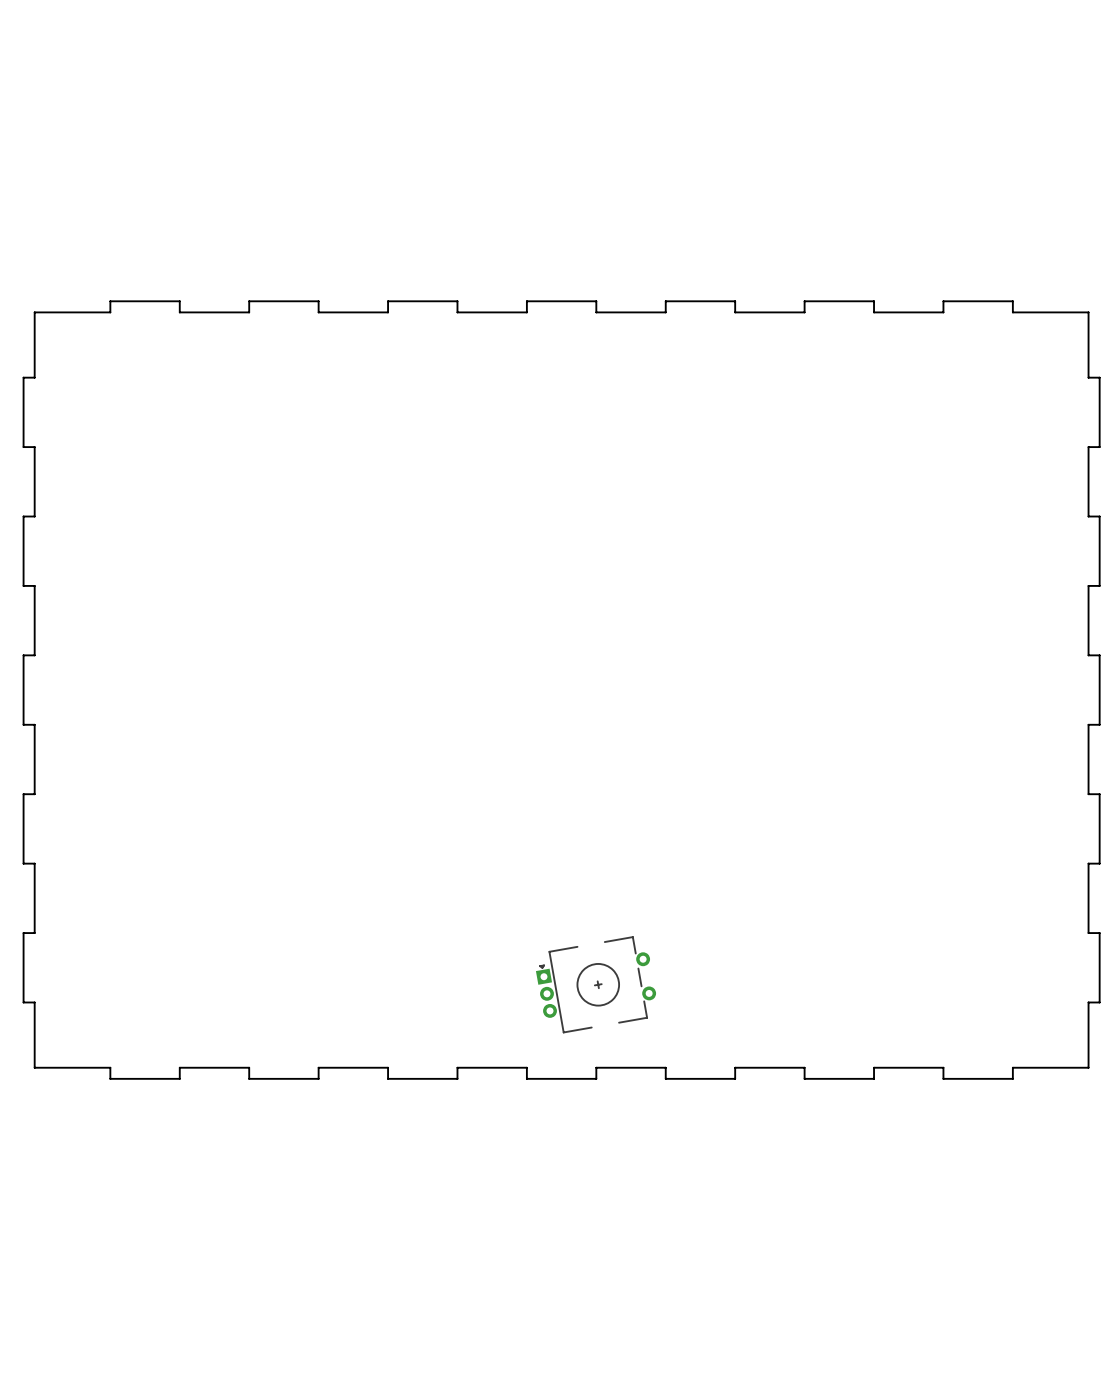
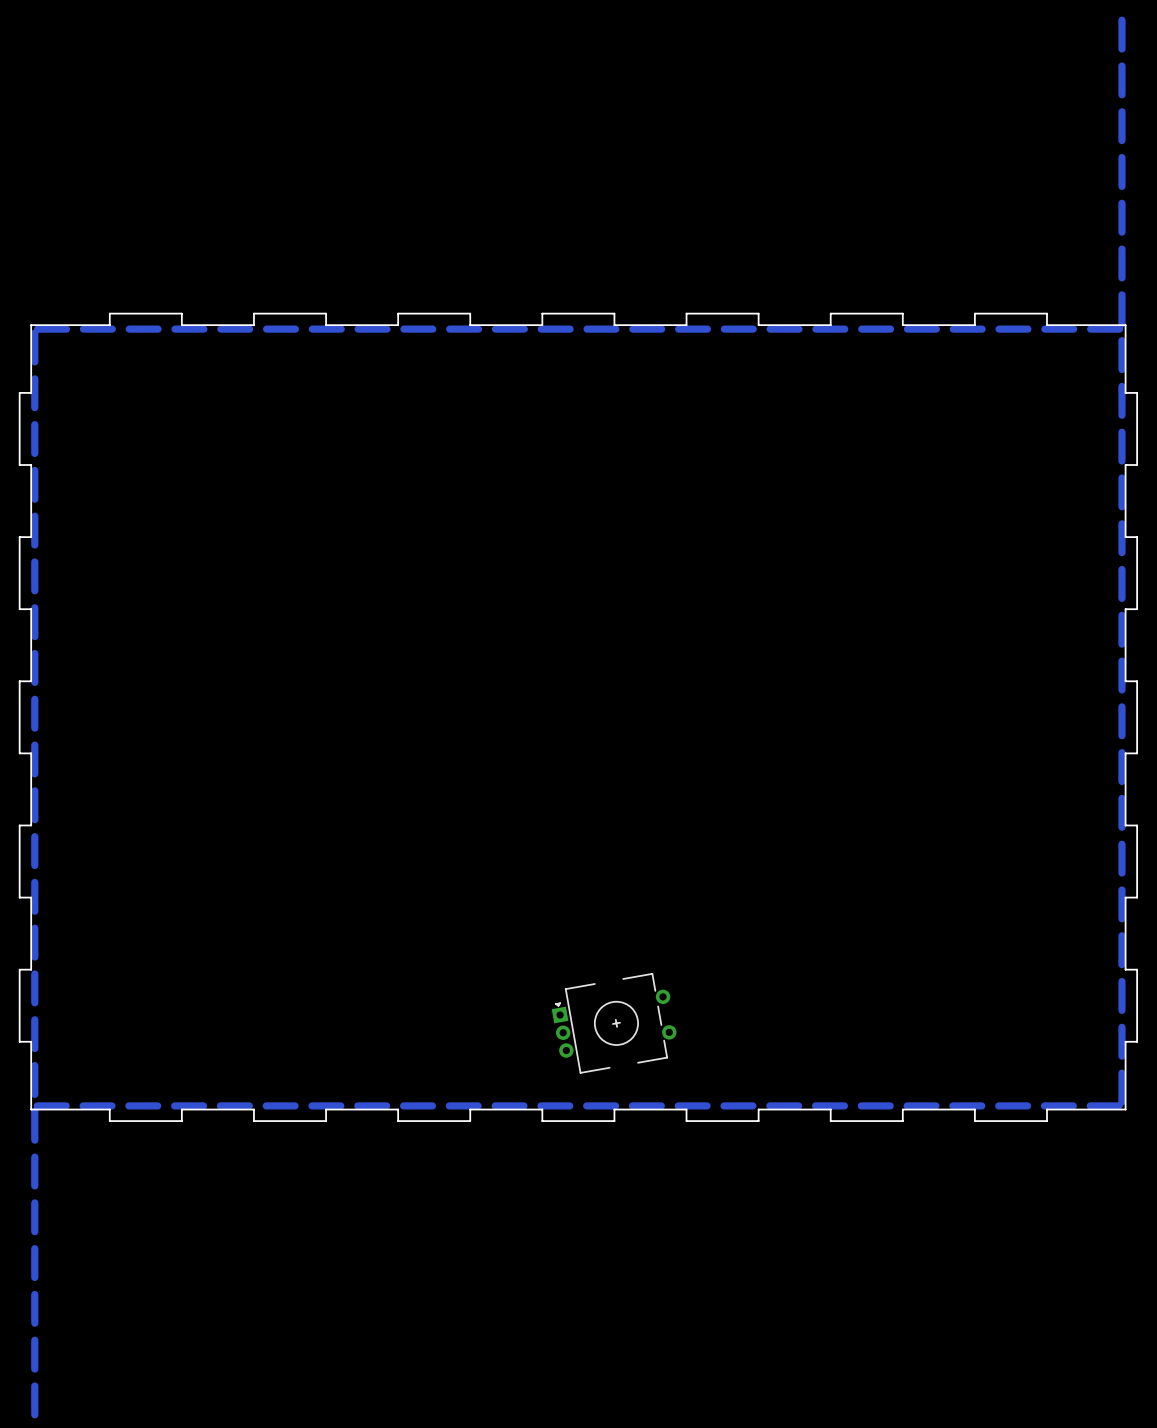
part: none -> (578, 329)
part: none -> (1121, 561)
part: none -> (34, 873)
part: none -> (578, 1105)

